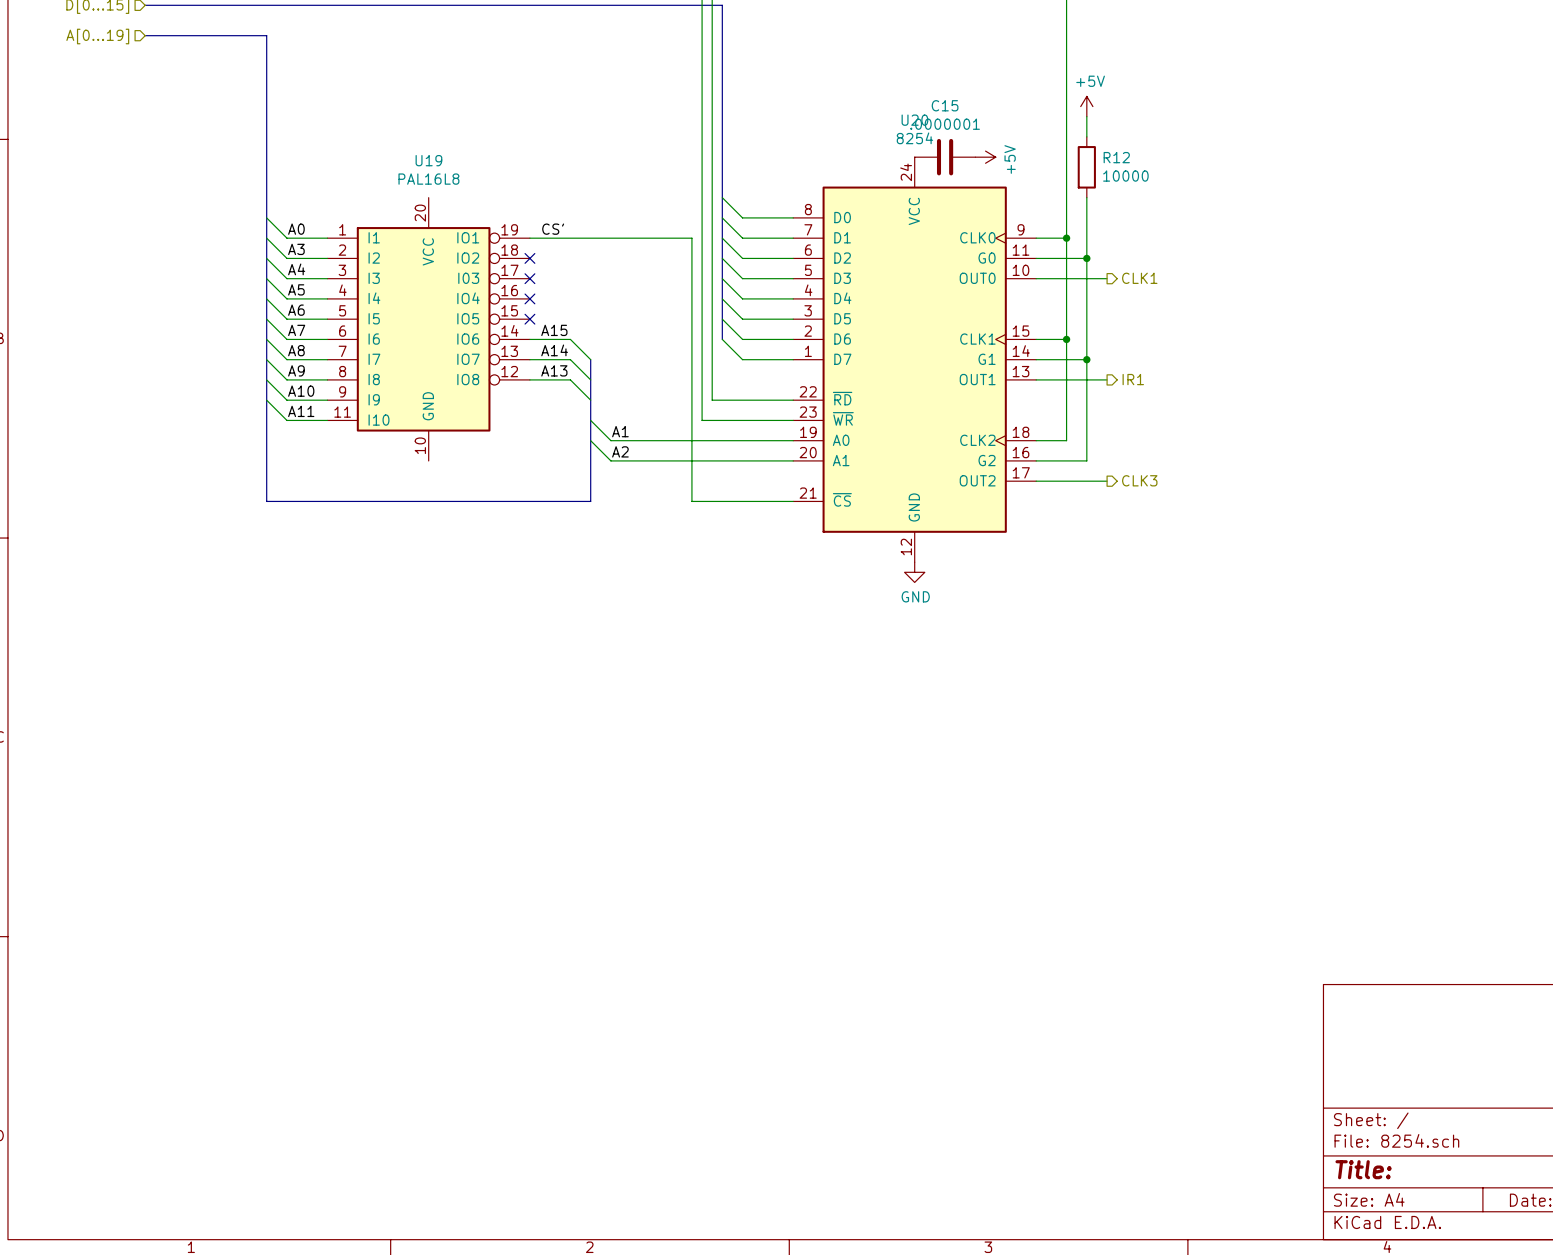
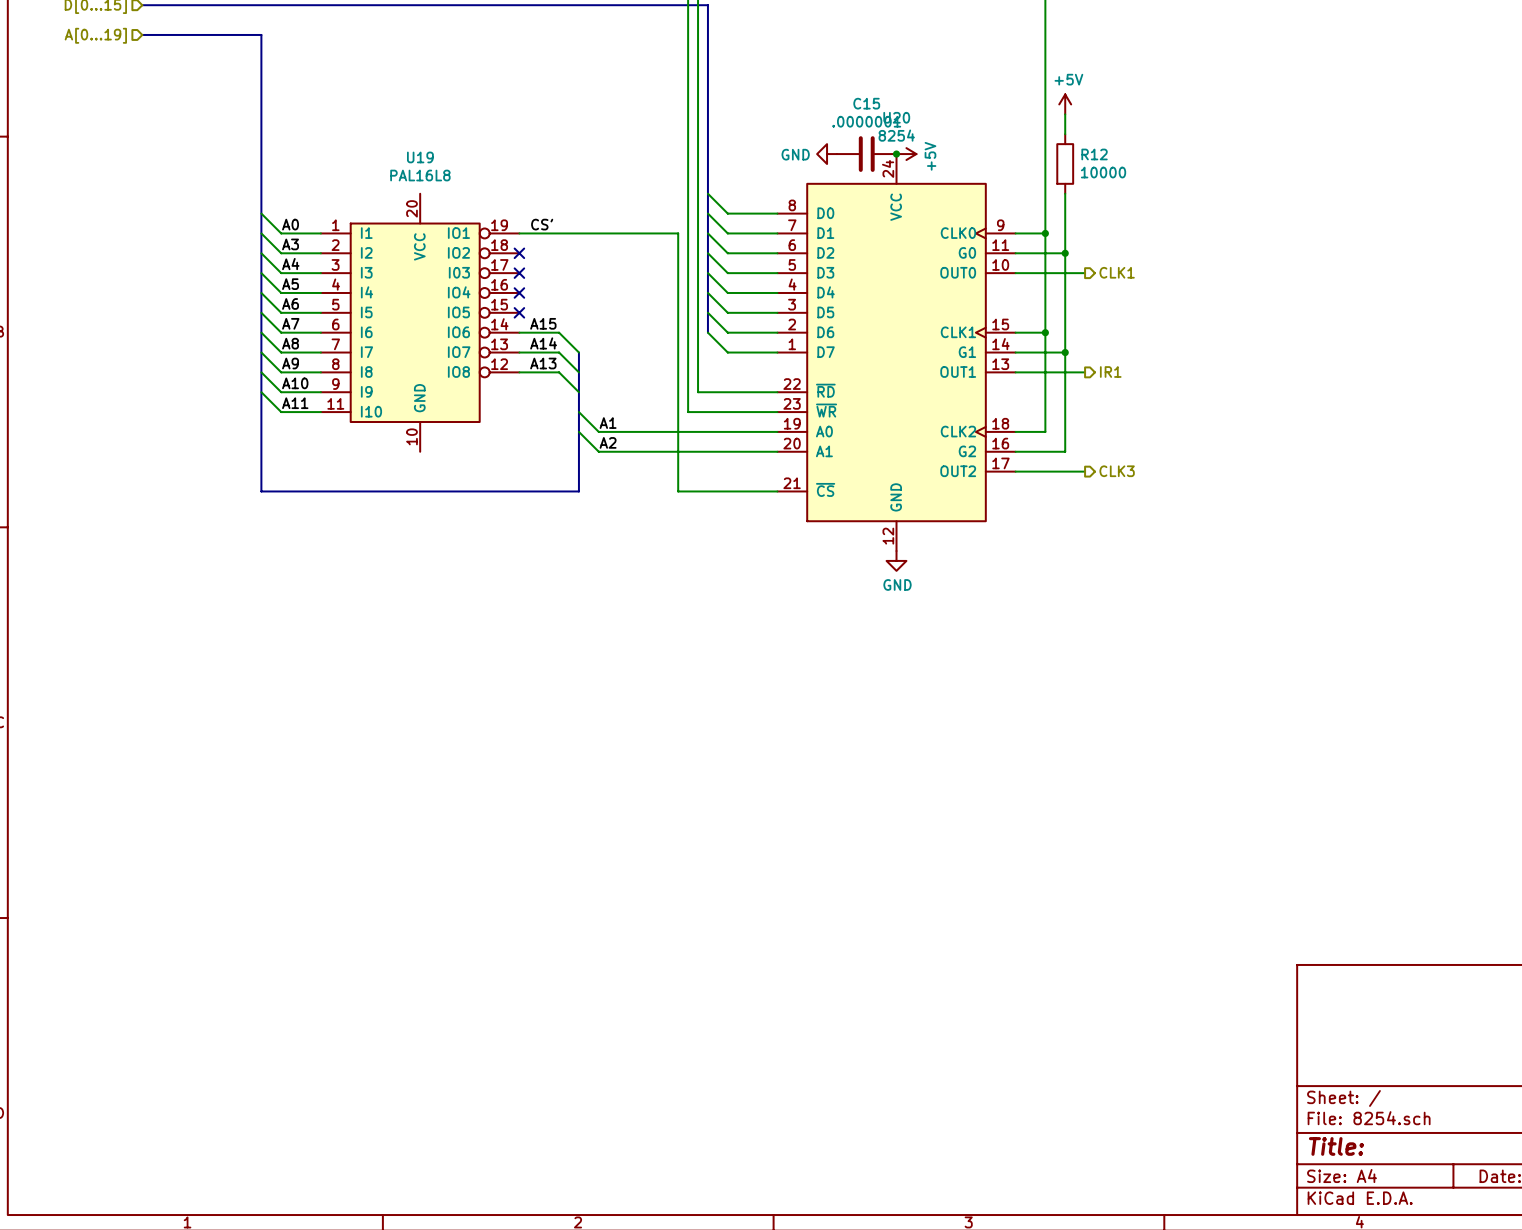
power symbol: none -> GND (827, 154)
junction: none -> (896, 154)
C15 position: (945, 157) -> (866, 154)
power symbol position: +5V (985, 157) -> +5V (906, 154)

